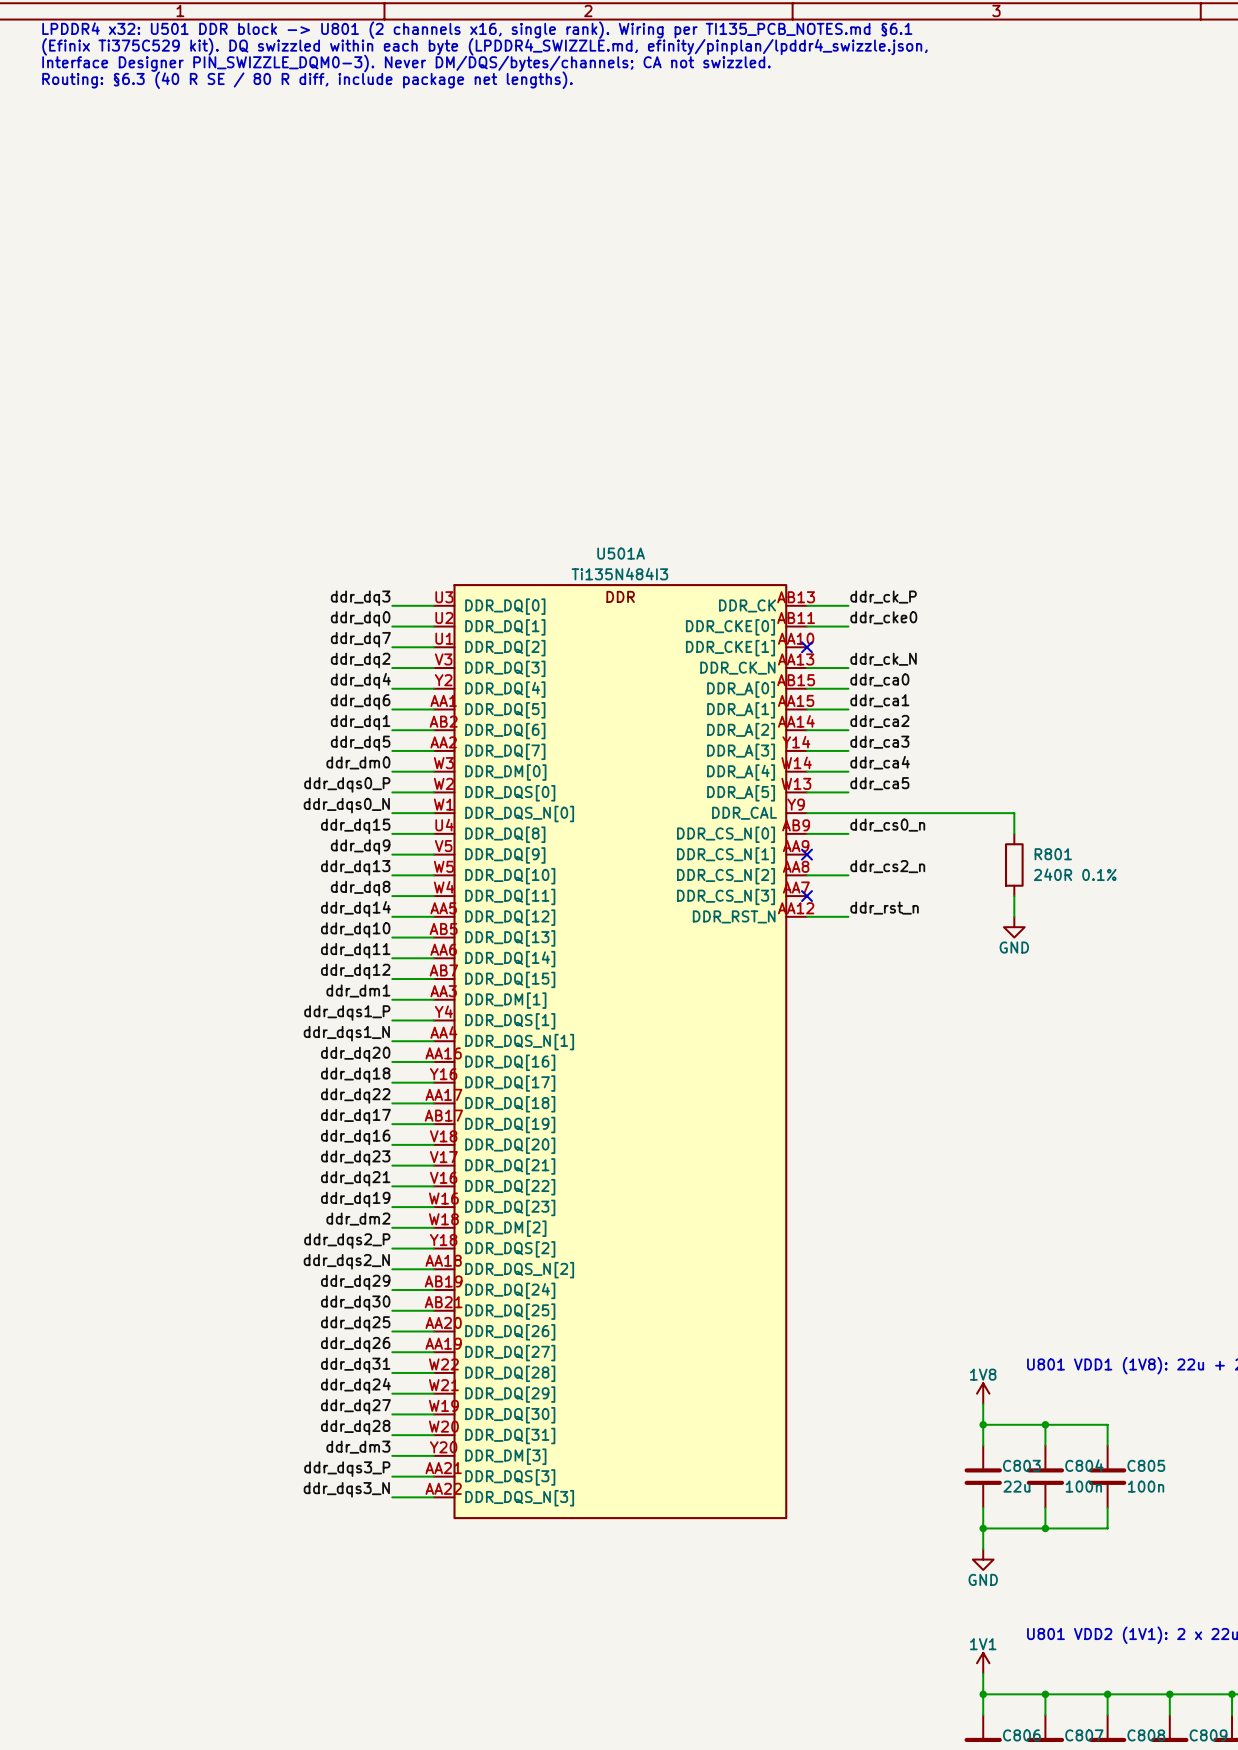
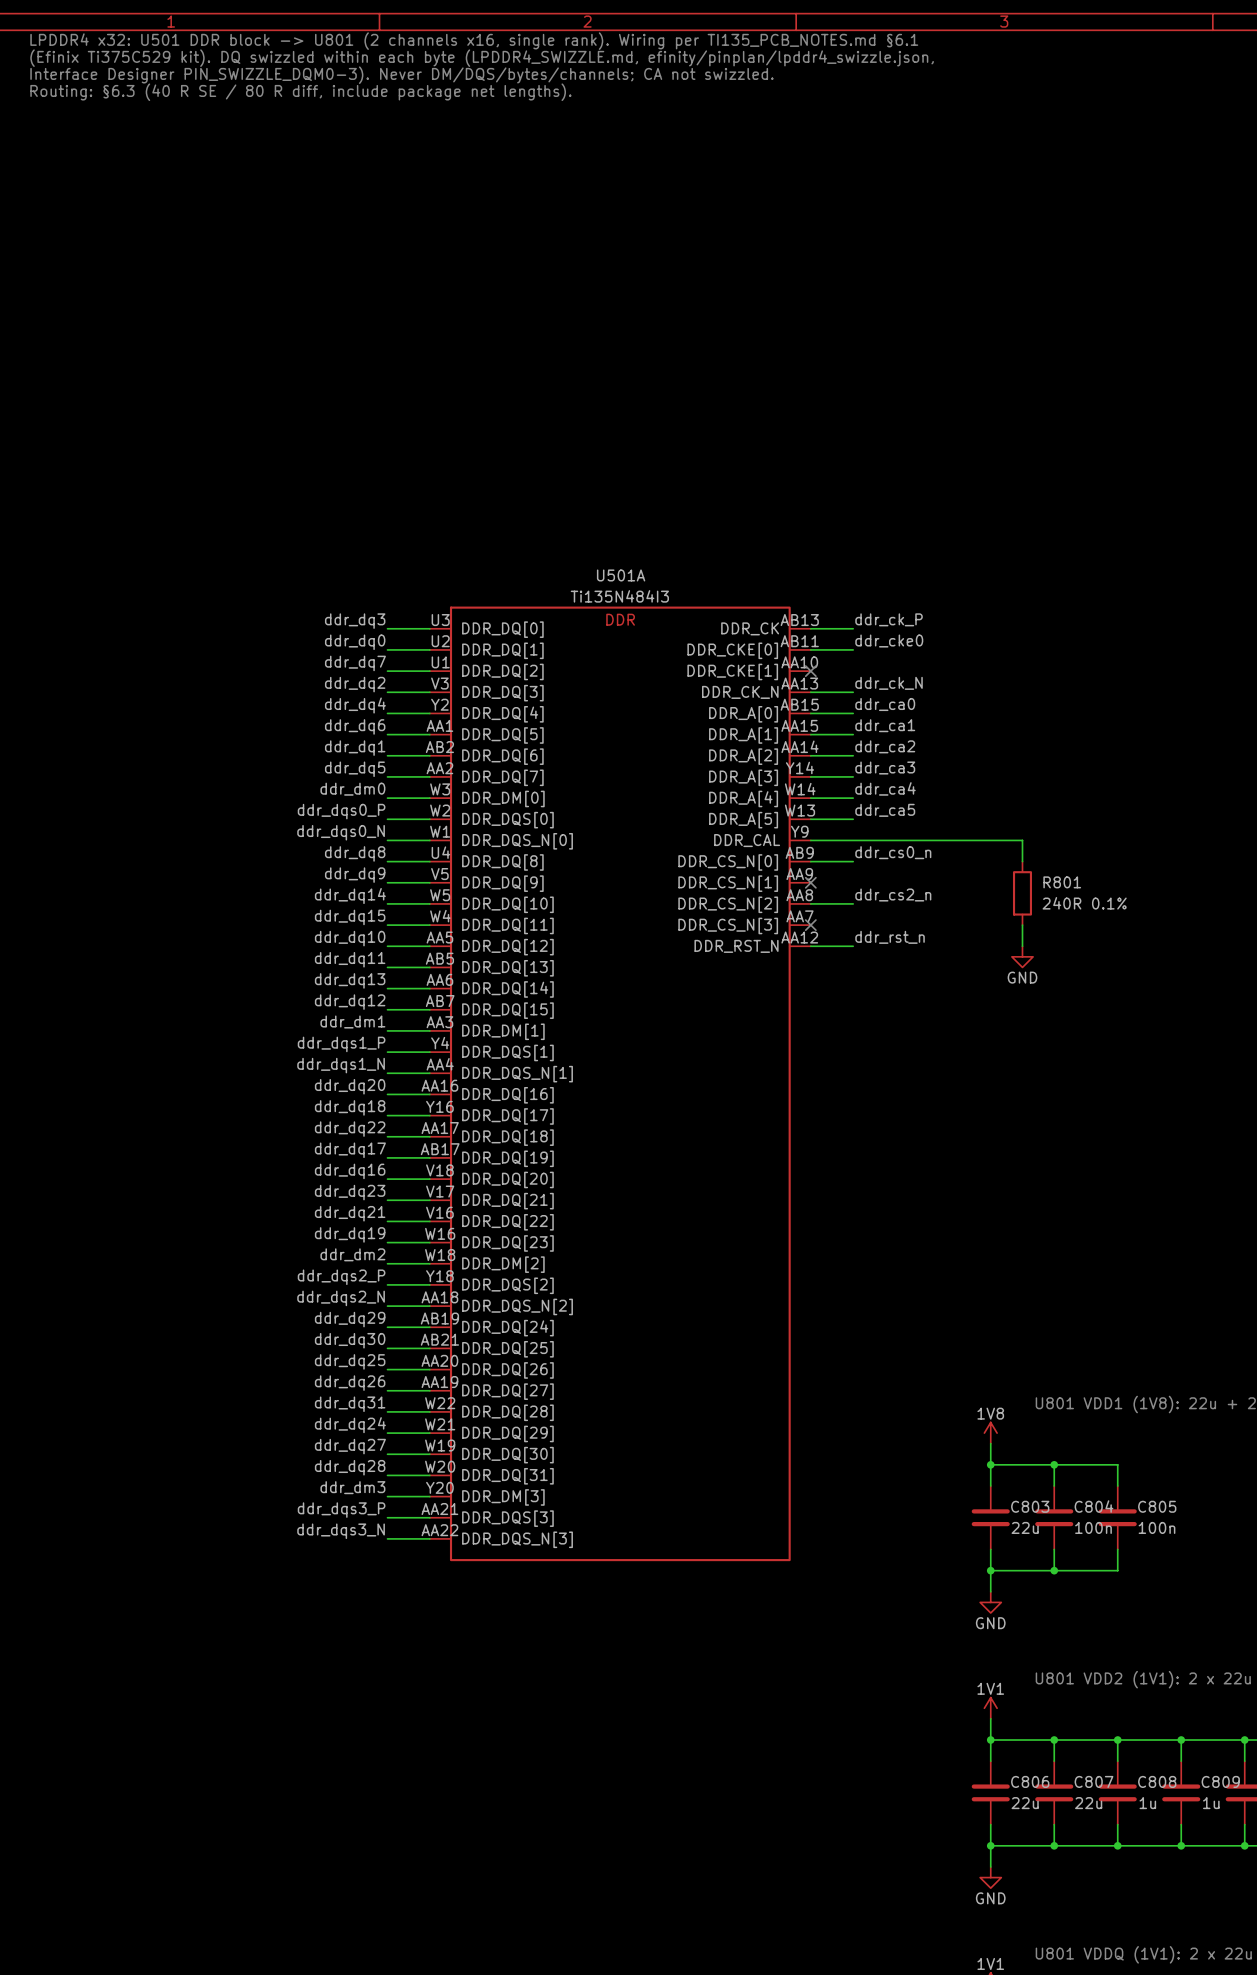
label: ddr_dq15 (355, 826) -> ddr_dq8 (355, 853)
label: ddr_dq13 (355, 867) -> ddr_dq14 (350, 896)
label: ddr_dq8 (360, 888) -> ddr_dq15 (350, 917)
label: ddr_dq14 (355, 909) -> ddr_dq10 (350, 938)
label: ddr_dq10 (355, 930) -> ddr_dq11 (350, 959)
label: ddr_dq11 (355, 950) -> ddr_dq13 (350, 980)

